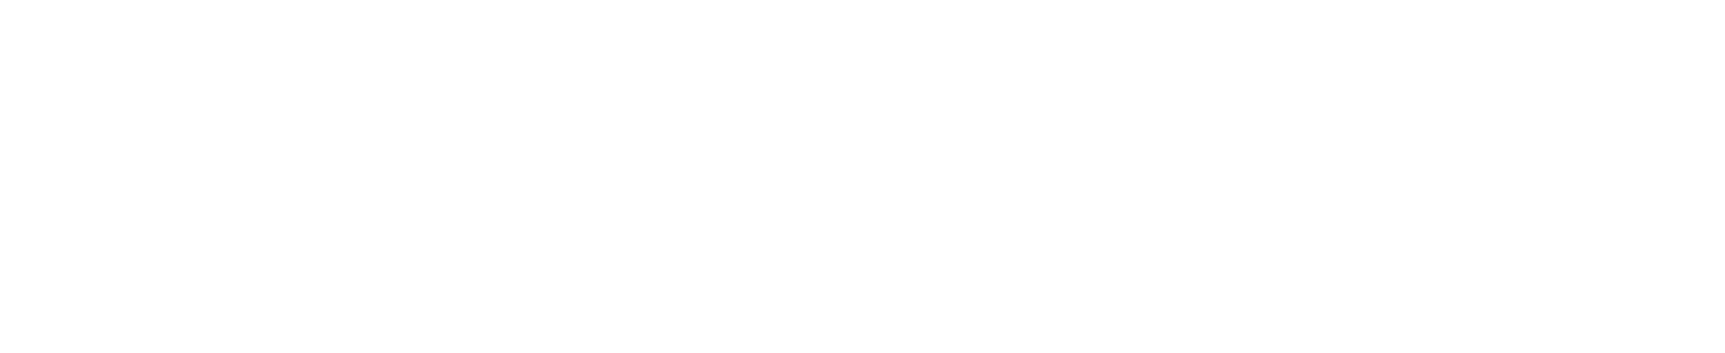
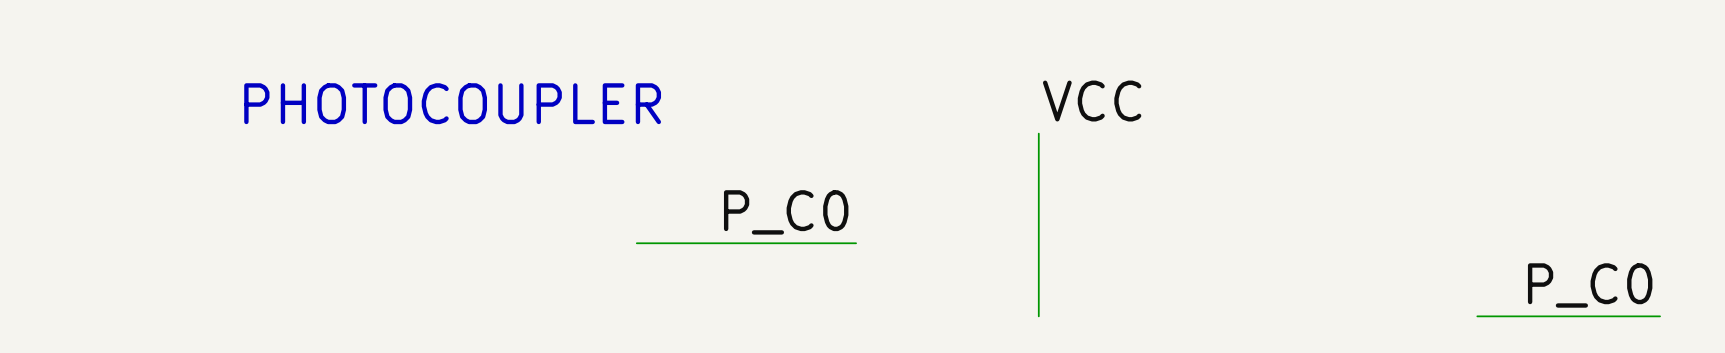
label: none -> VCC (1092, 101)
text: none -> PHOTOCOUPLER (452, 103)
wire: none -> (1038, 133) (1038, 316)
label: none -> P_C0 (786, 212)
wire: none -> (636, 243) (856, 243)
label: none -> P_C0 (1590, 285)
wire: none -> (1477, 316) (1660, 316)

